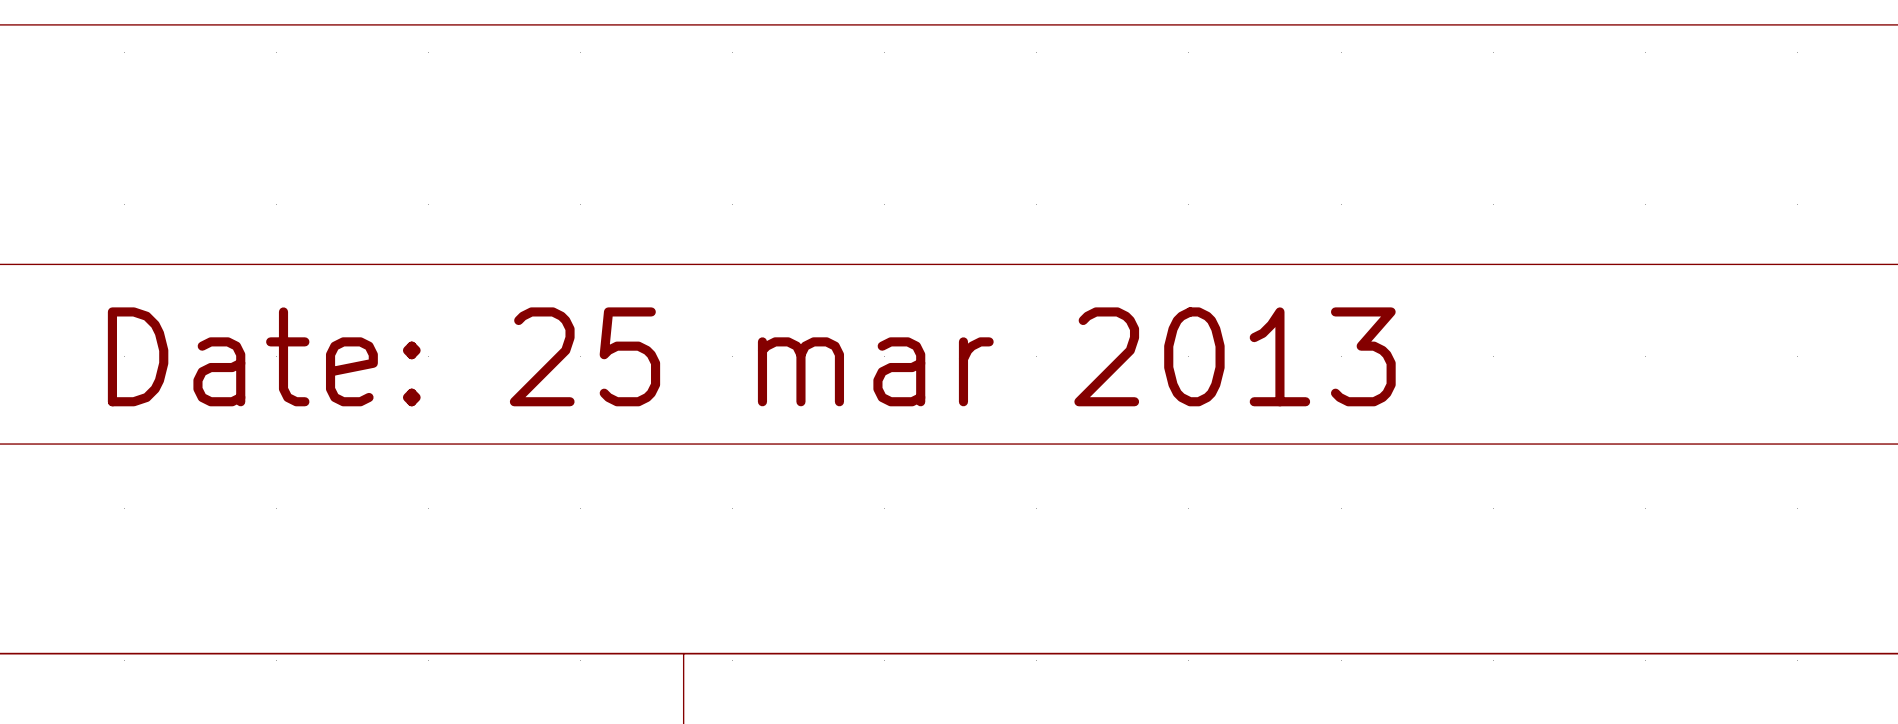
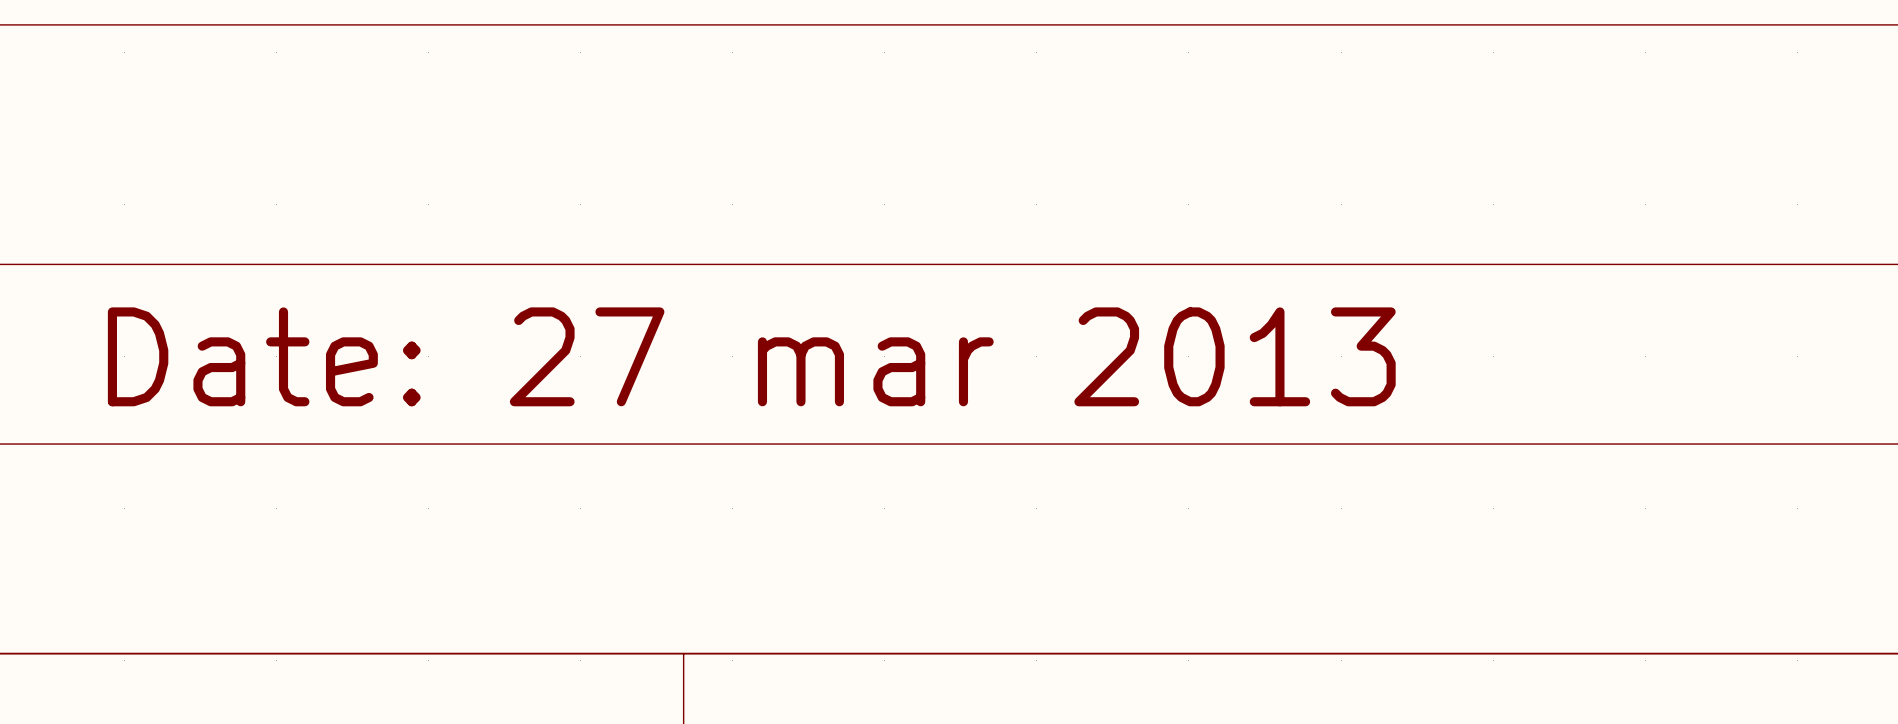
title block: Date: 25 mar 2013 (751, 356) -> Date: 27 mar 2013 (751, 356)

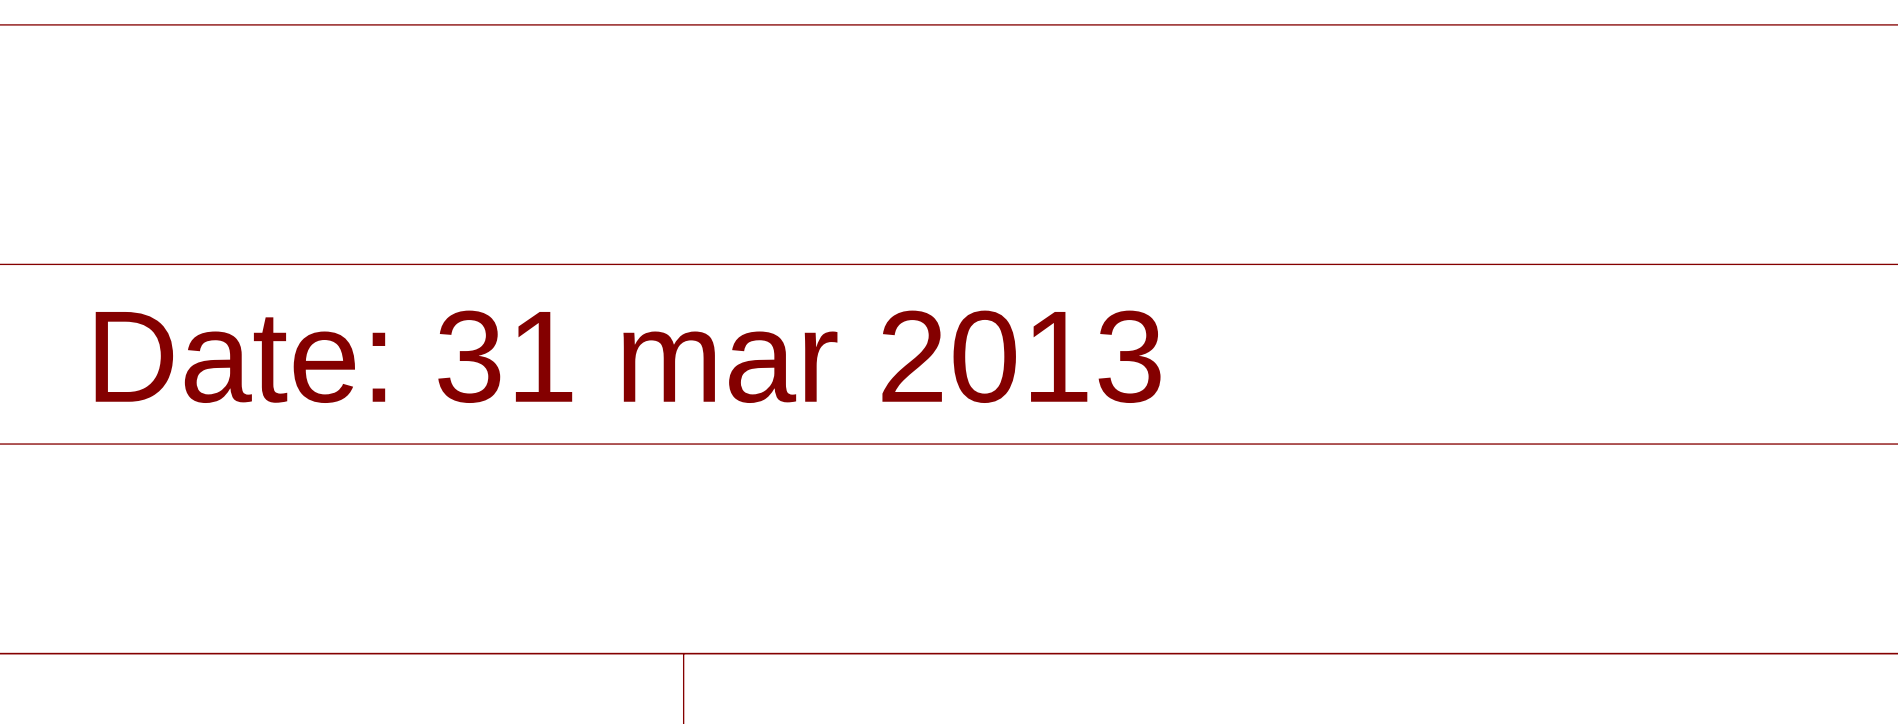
title block: Date: 27 mar 2013 (751, 356) -> Date: 31 mar 2013 (628, 356)

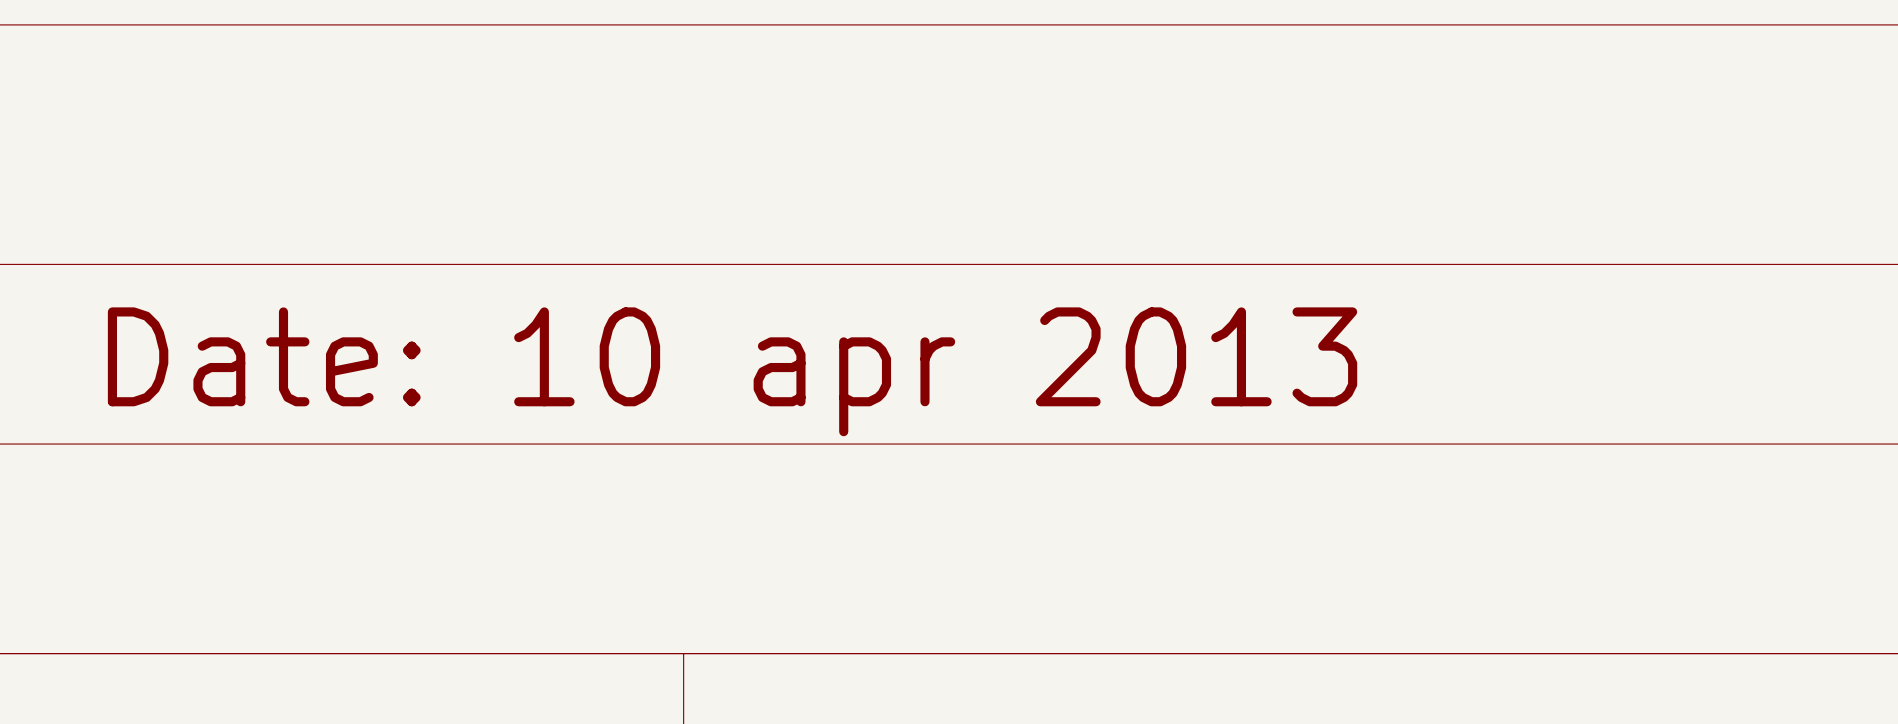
title block: Date: 31 mar 2013 (628, 356) -> Date: 10 apr 2013 (732, 371)

